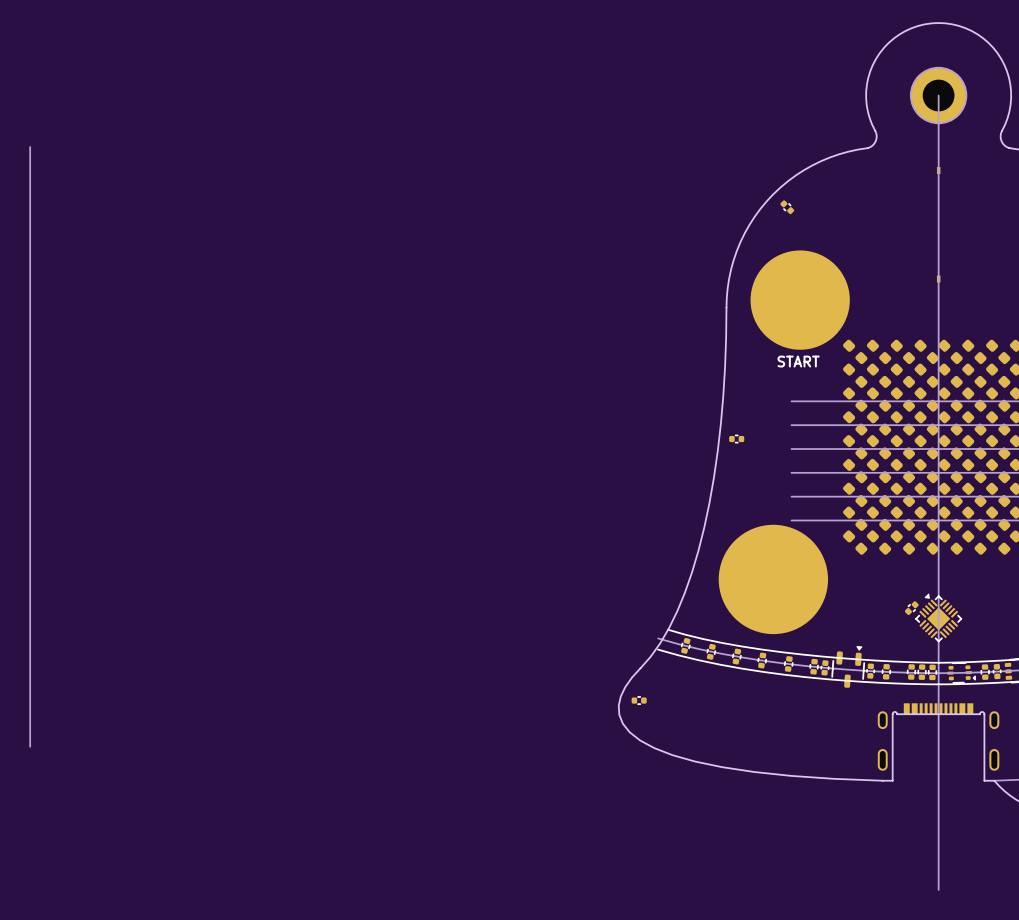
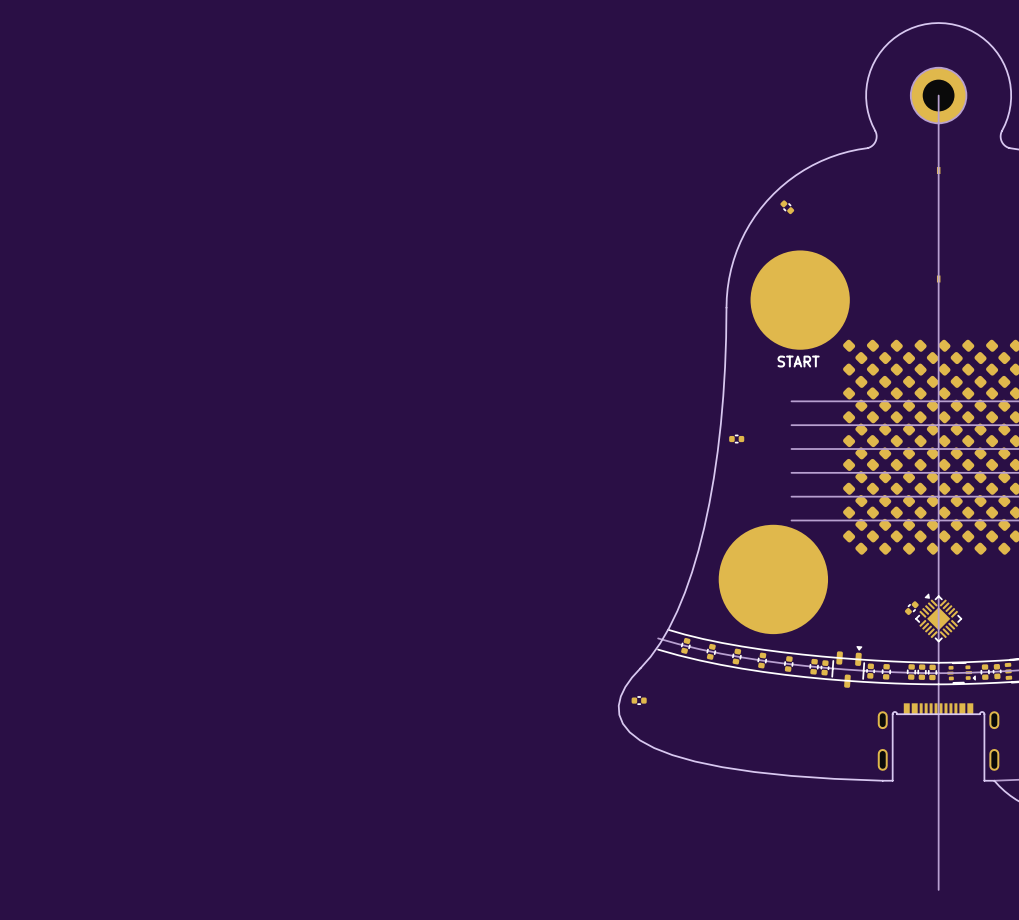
line: (30, 147) (30, 746) -> none

